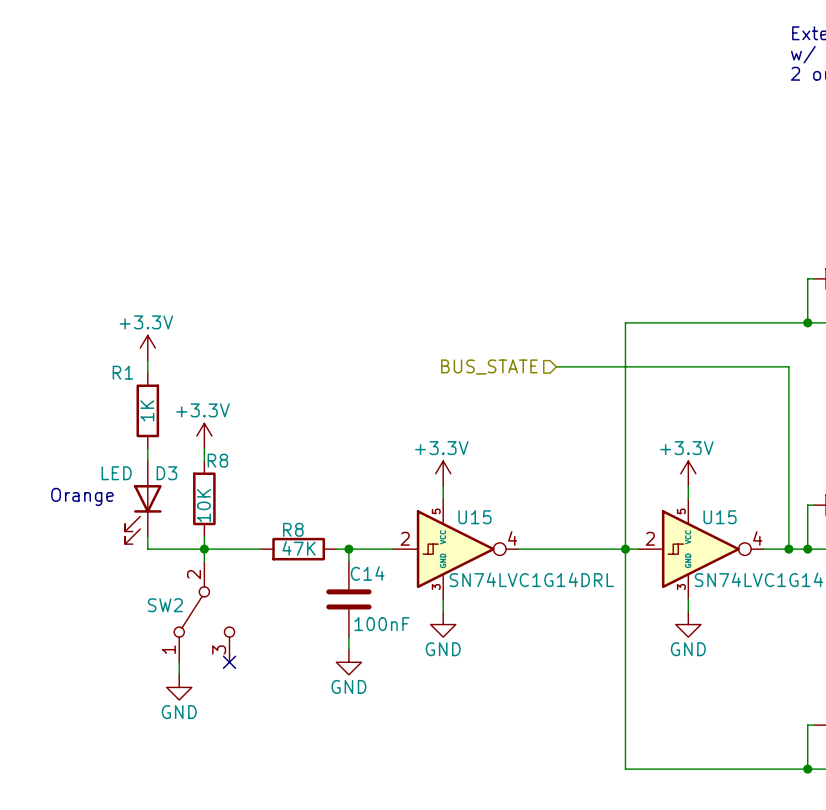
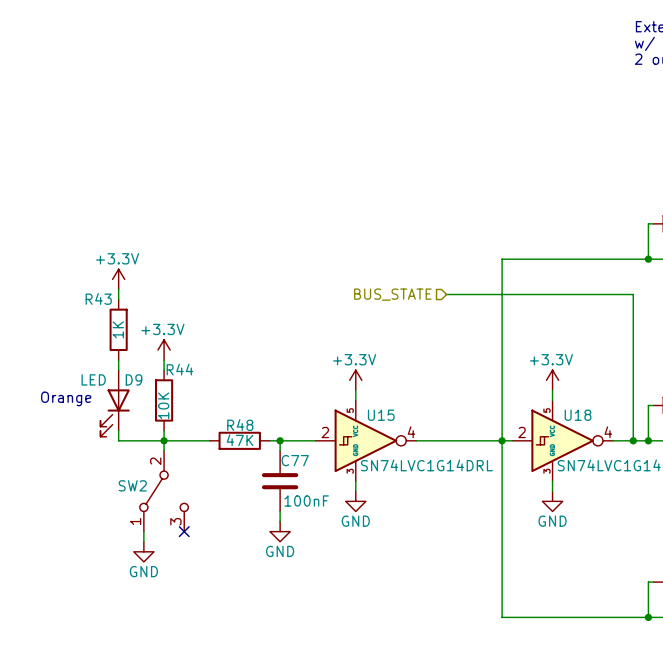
R1 name: R1 (122, 372) -> R43 (98, 298)
R8 name: R8 (217, 460) -> R44 (179, 369)
D3 name: D3 (166, 473) -> D9 (134, 379)
U15 name: U15 (720, 517) -> U18 (578, 415)
R8 name: R8 (293, 529) -> R48 (240, 425)
C14 name: C14 (367, 573) -> C77 (295, 460)

